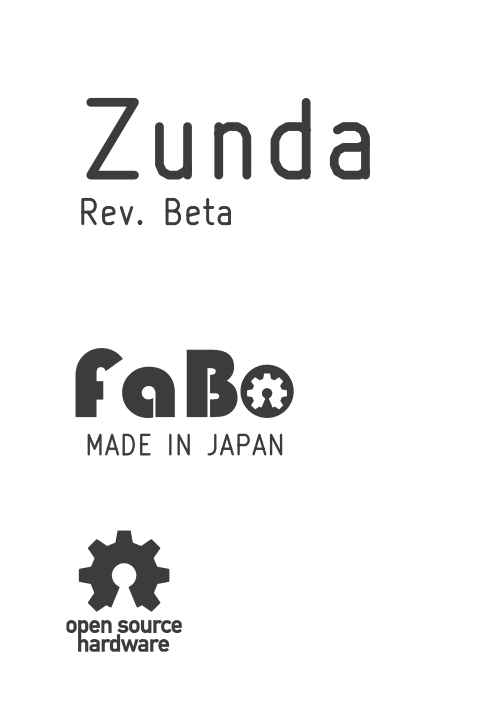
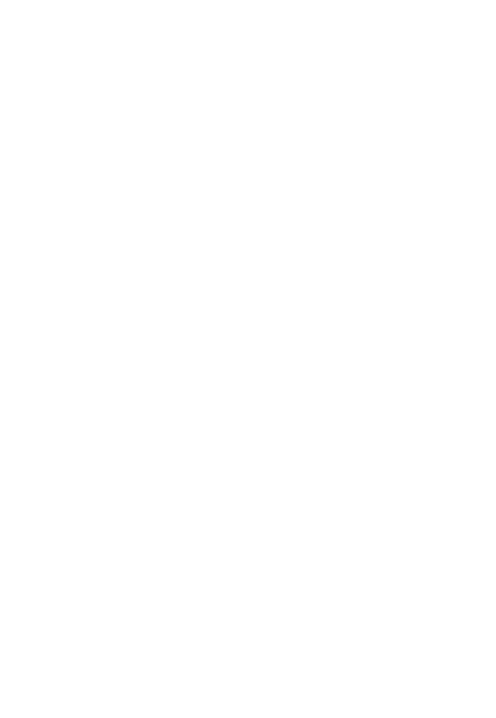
text: Zunda (228, 138) -> none
text: Rev. Beta (156, 211) -> none
drawing: [75, 348, 294, 419] -> none
text: MADE IN JAPAN (184, 444) -> none
drawing: [66, 530, 182, 652] -> none

